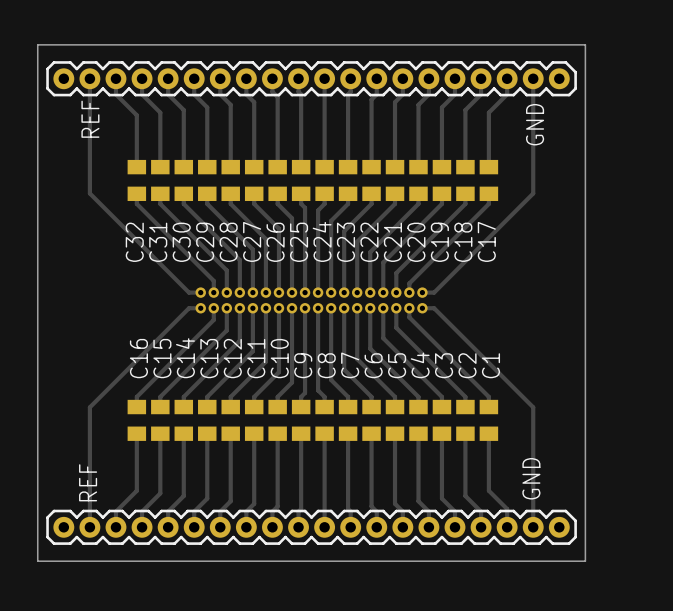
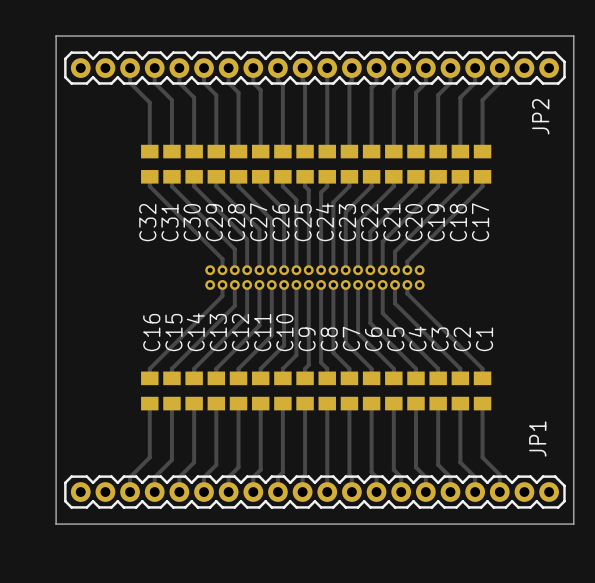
track: (89, 78) (89, 193) (189, 292) (200, 292) -> none
track: (533, 78) (533, 193) (434, 292) (422, 292) -> none
text: REF (90, 119) -> none
text: GND (535, 124) -> none
JP2 name: none -> JP2 (540, 116)
track: (200, 308) (189, 308) (89, 407) (89, 527) -> none
track: (422, 308) (434, 308) (533, 407) (533, 527) -> none
JP1 name: none -> JP1 (537, 439)
text: GND (531, 478) -> none
text: REF (88, 482) -> none

